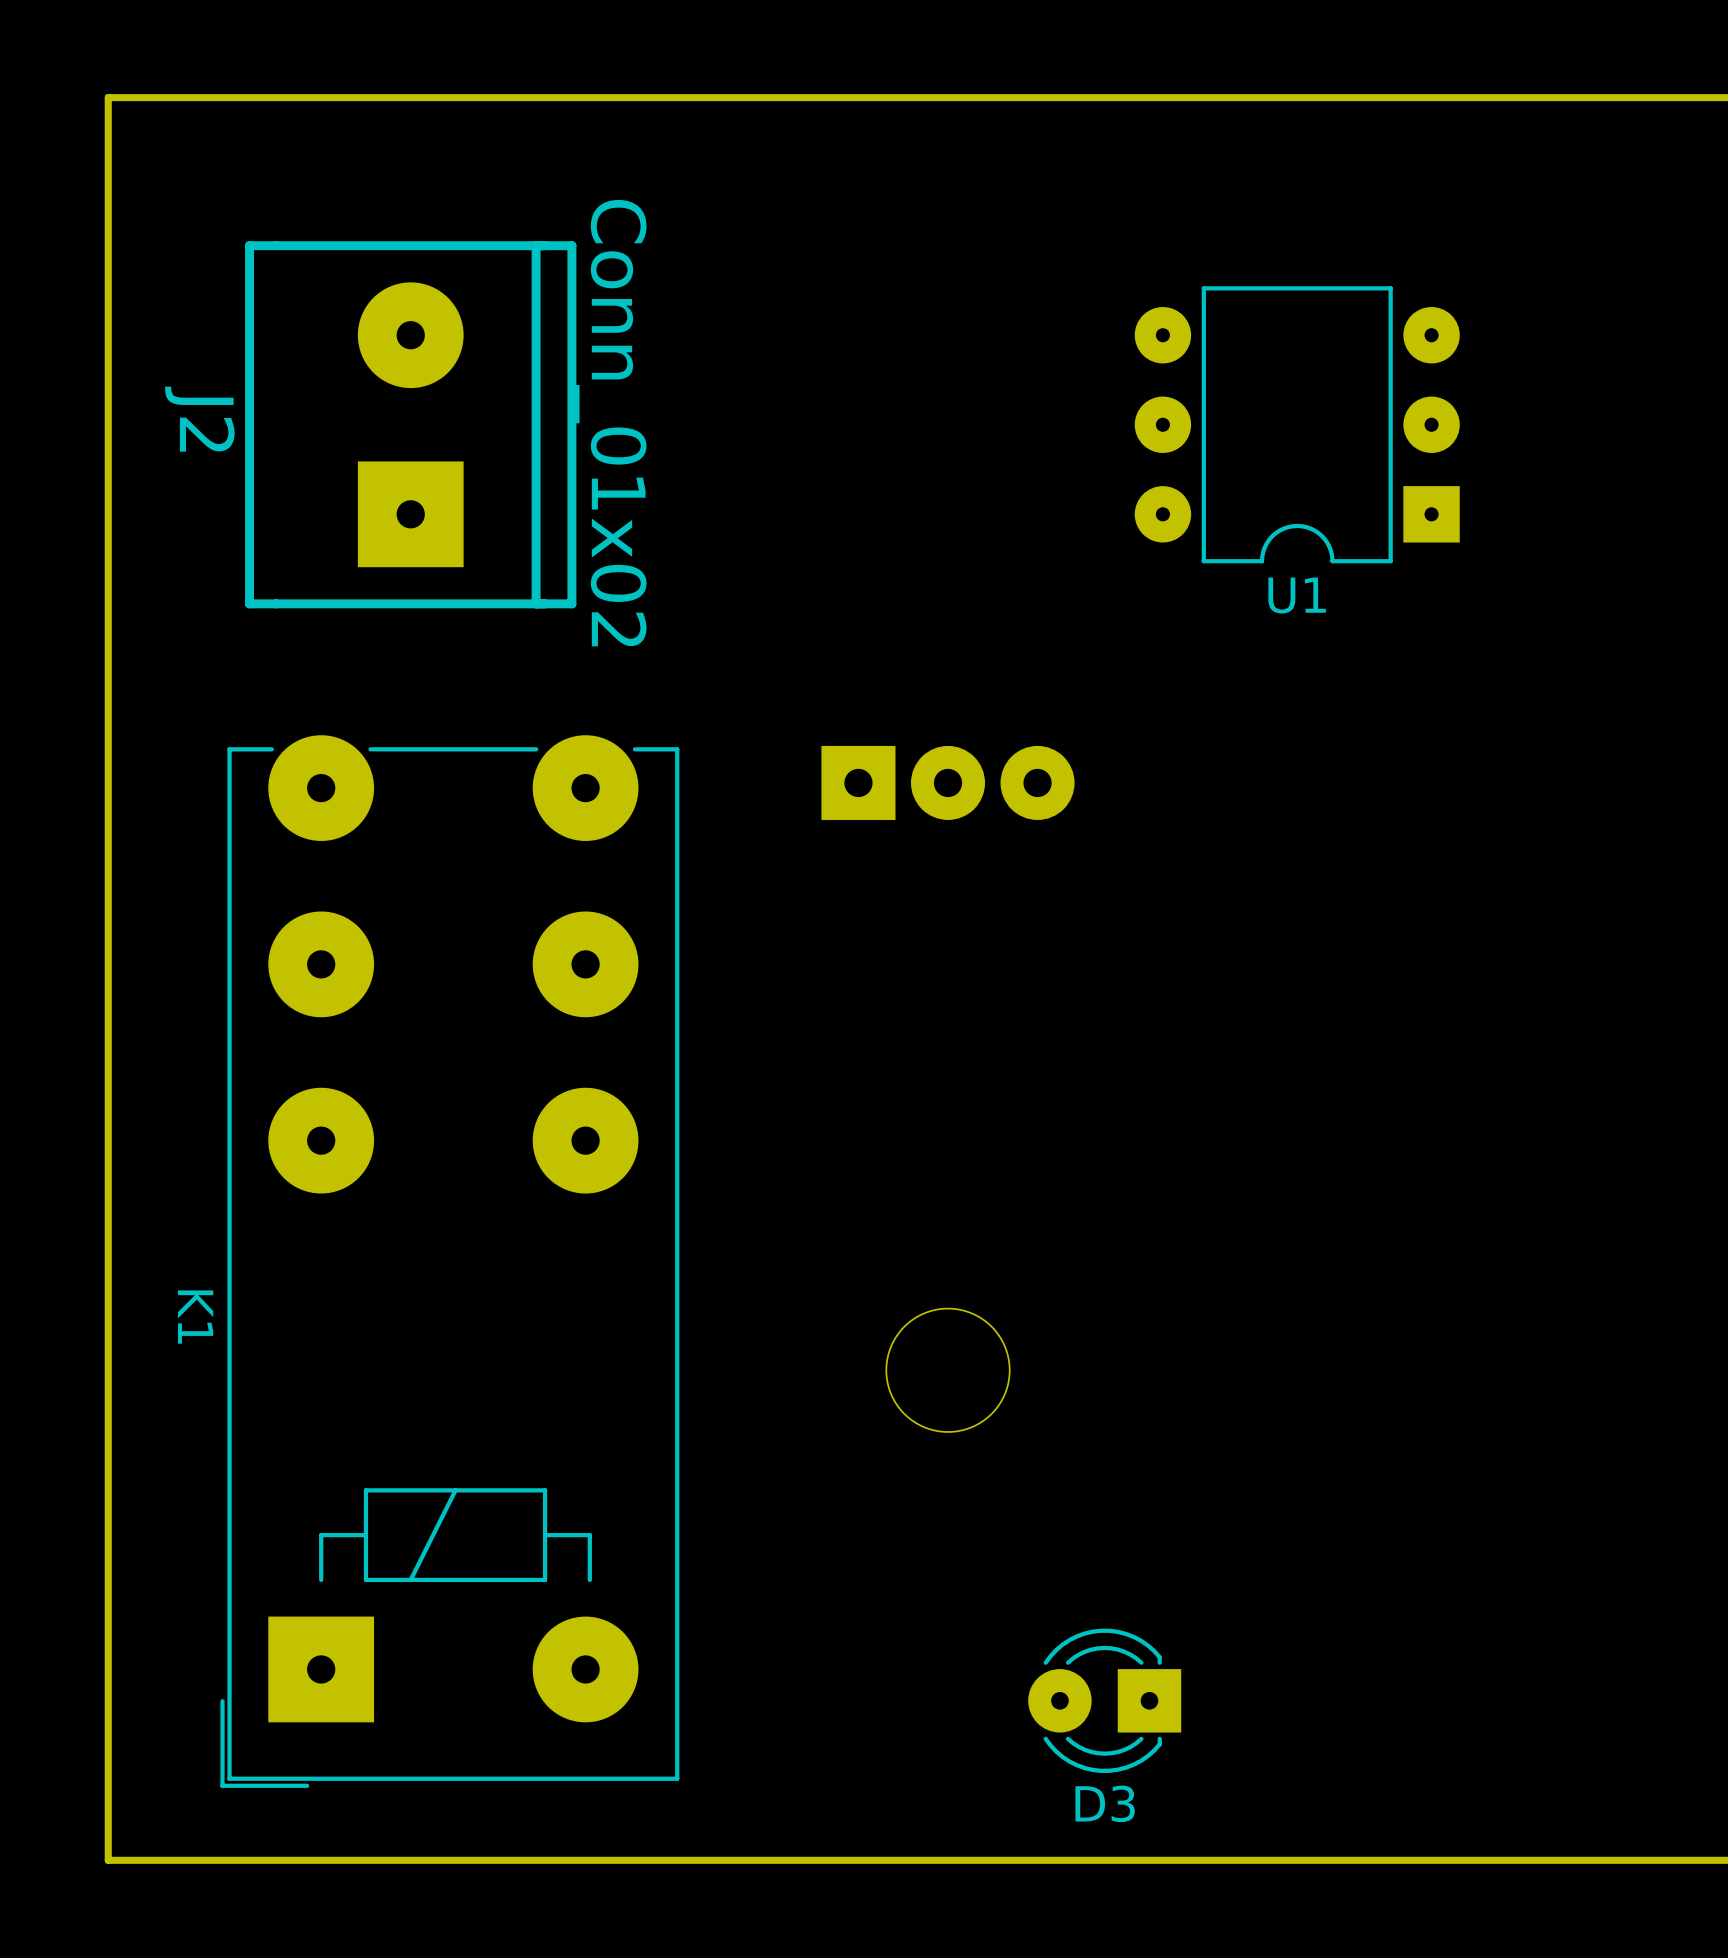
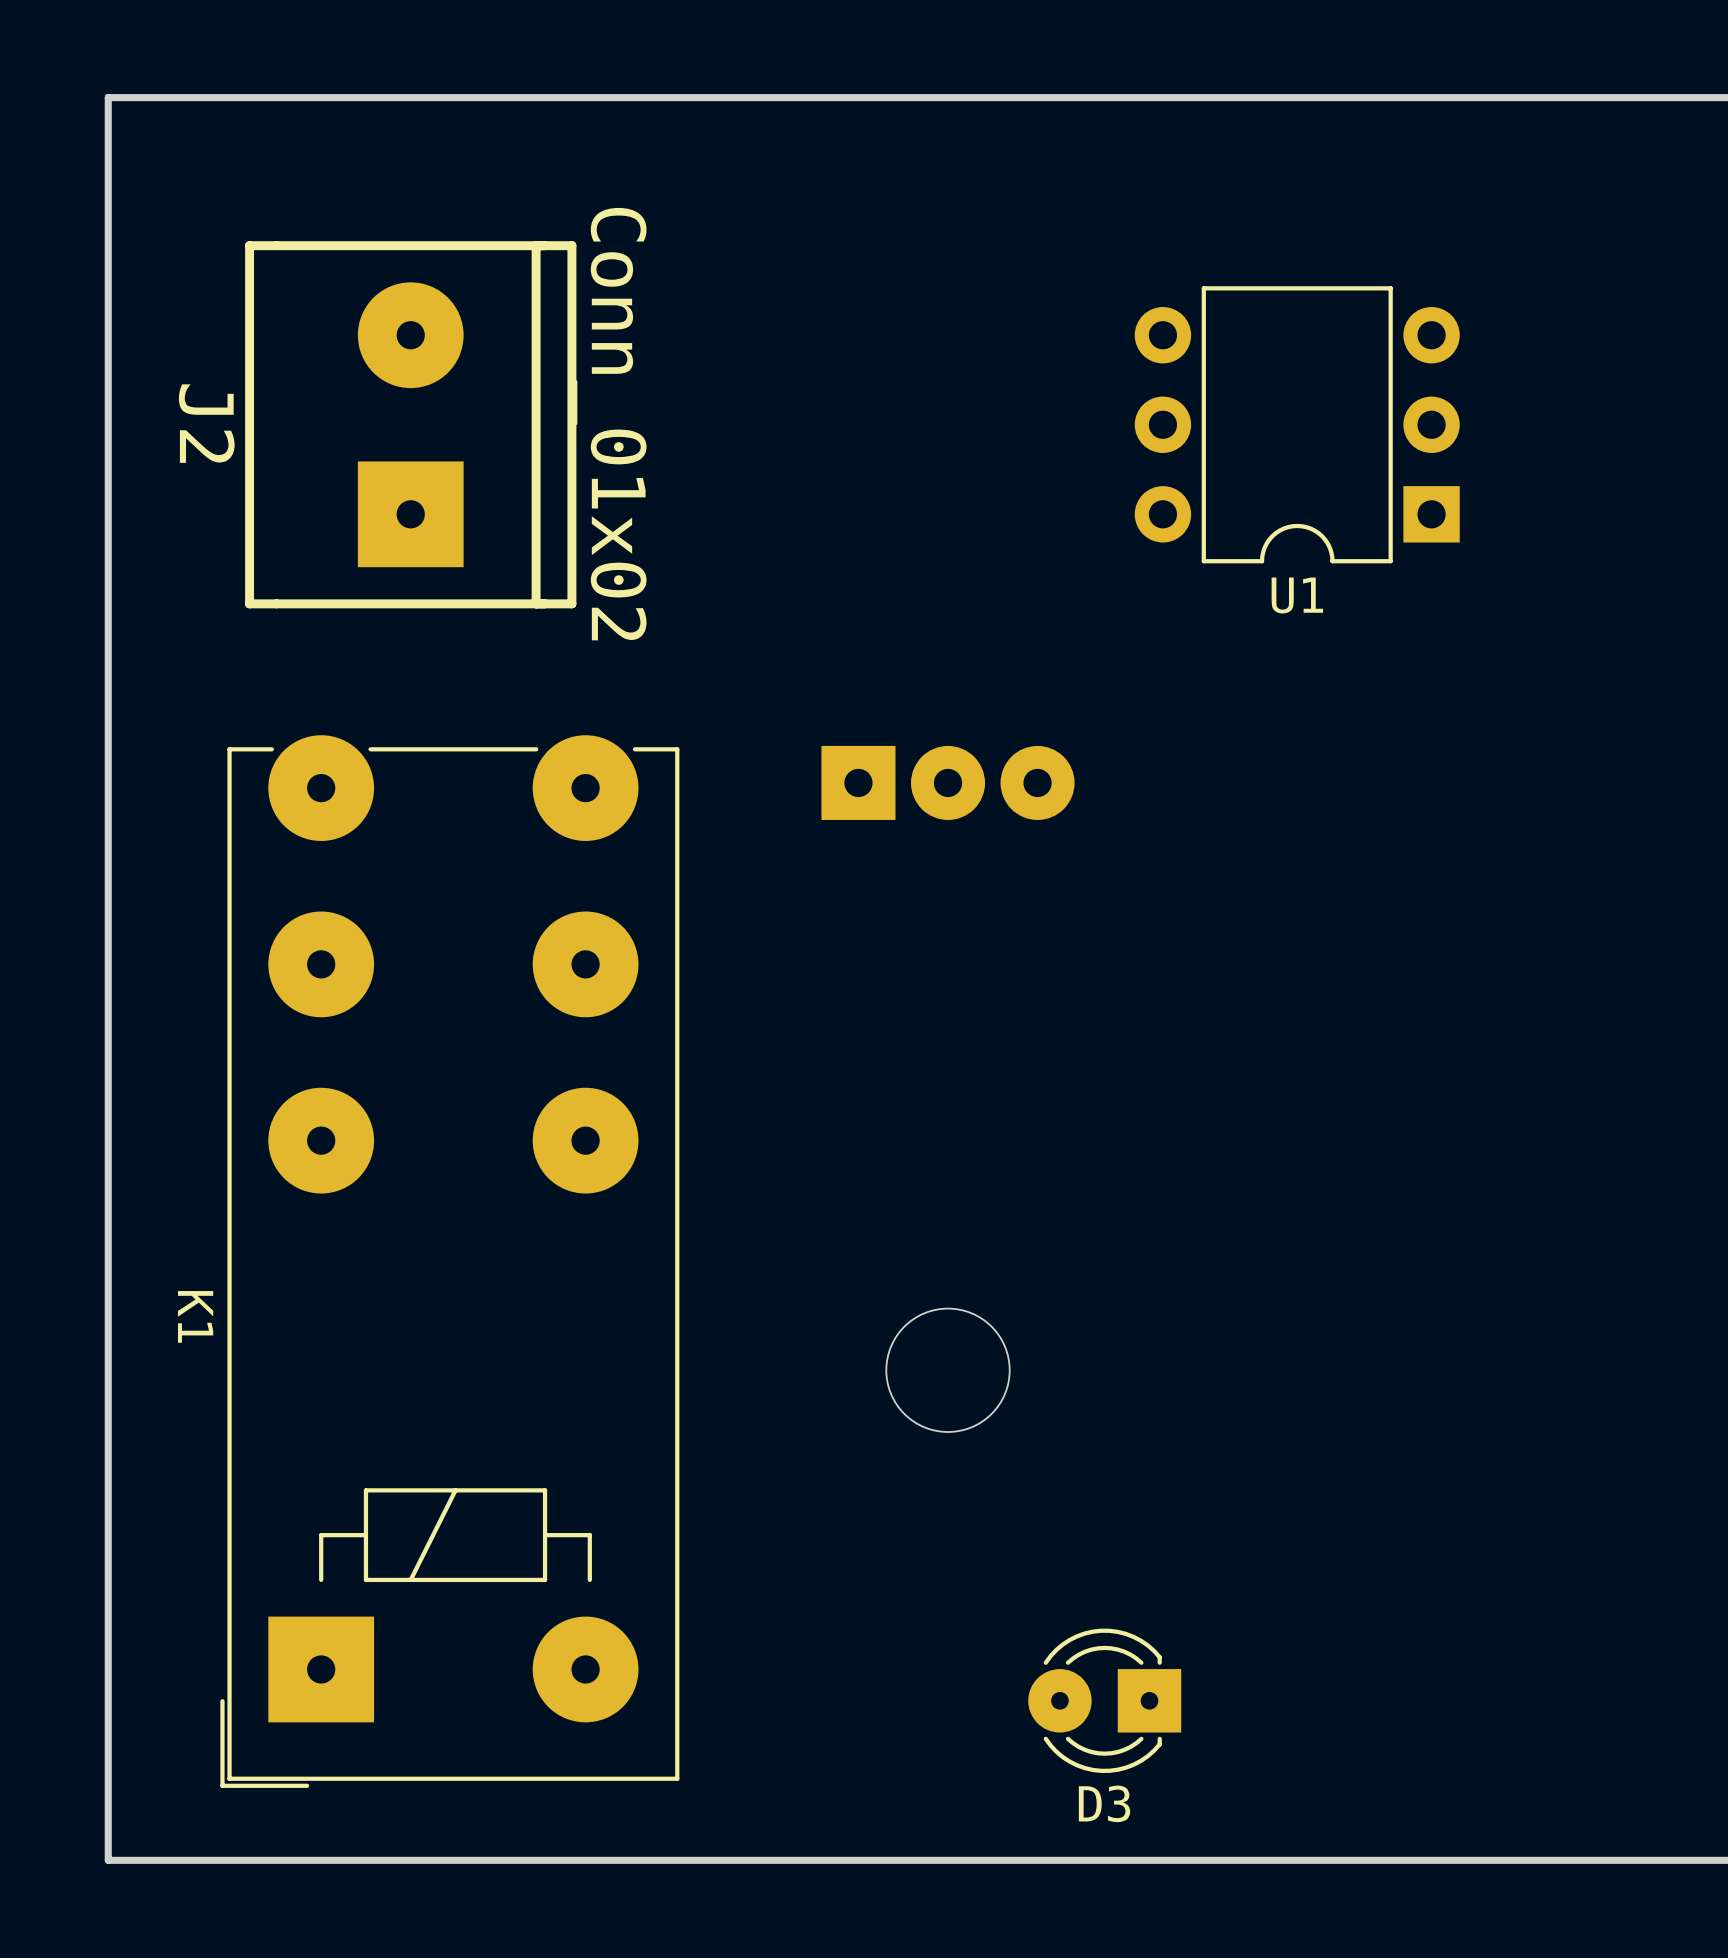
U1 footprint: [1134, 286, 1460, 564] -> [1134, 286, 1460, 564]

